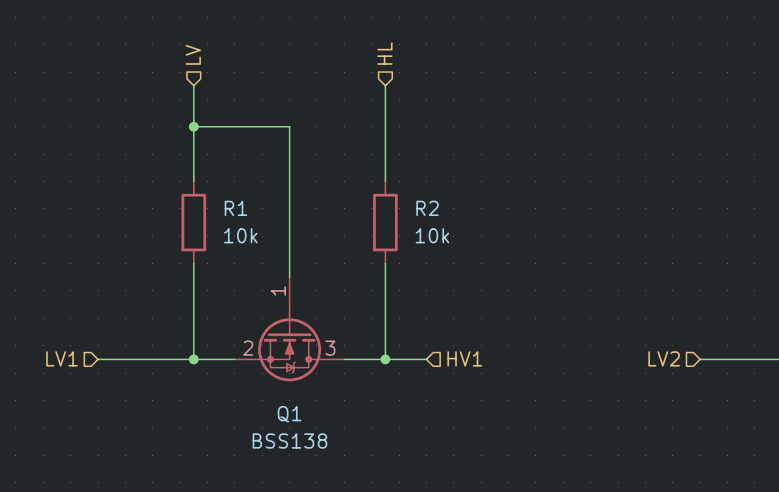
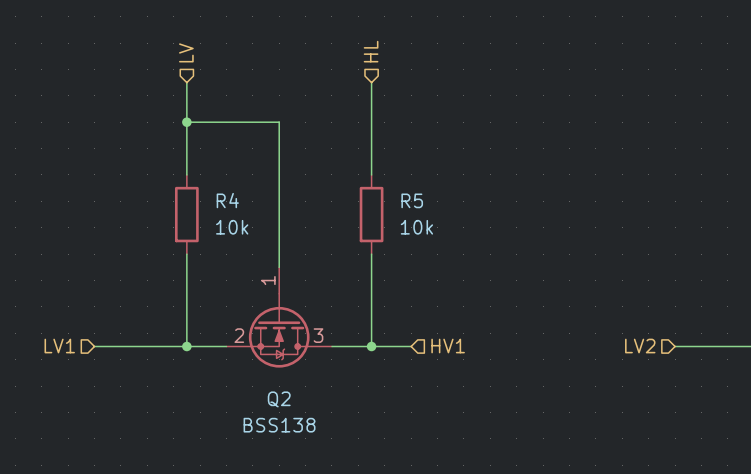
R1 name: R1 (235, 208) -> R4 (227, 200)
R2 name: R2 (427, 208) -> R5 (412, 200)
Q1 name: Q1 (289, 414) -> Q2 (279, 399)

